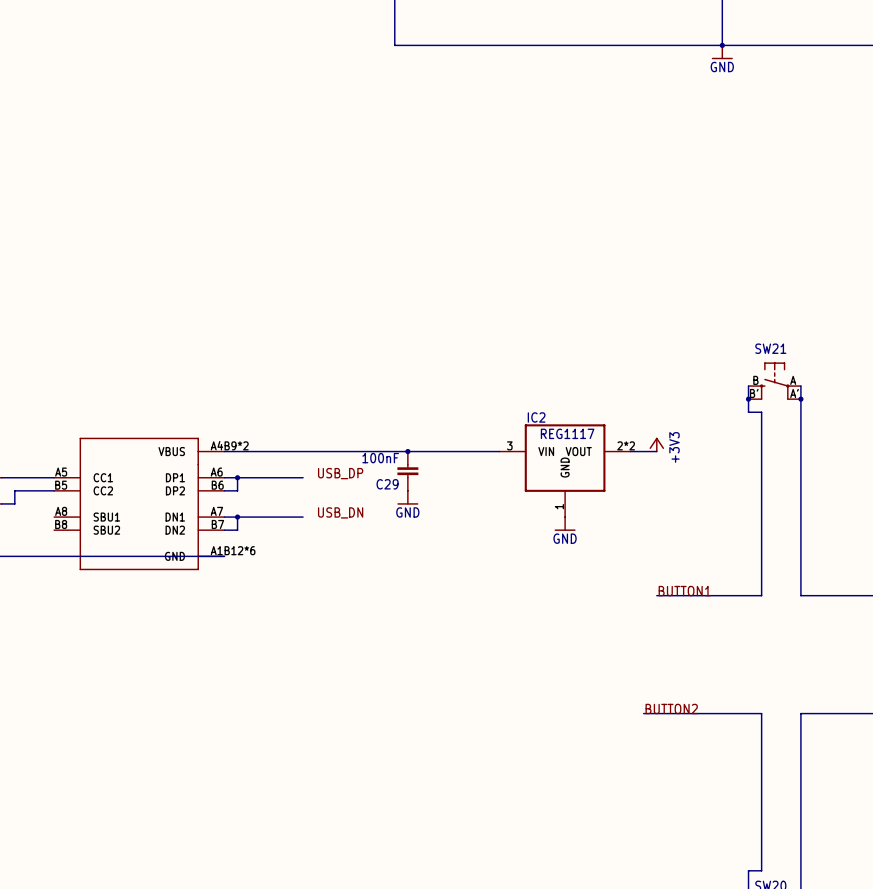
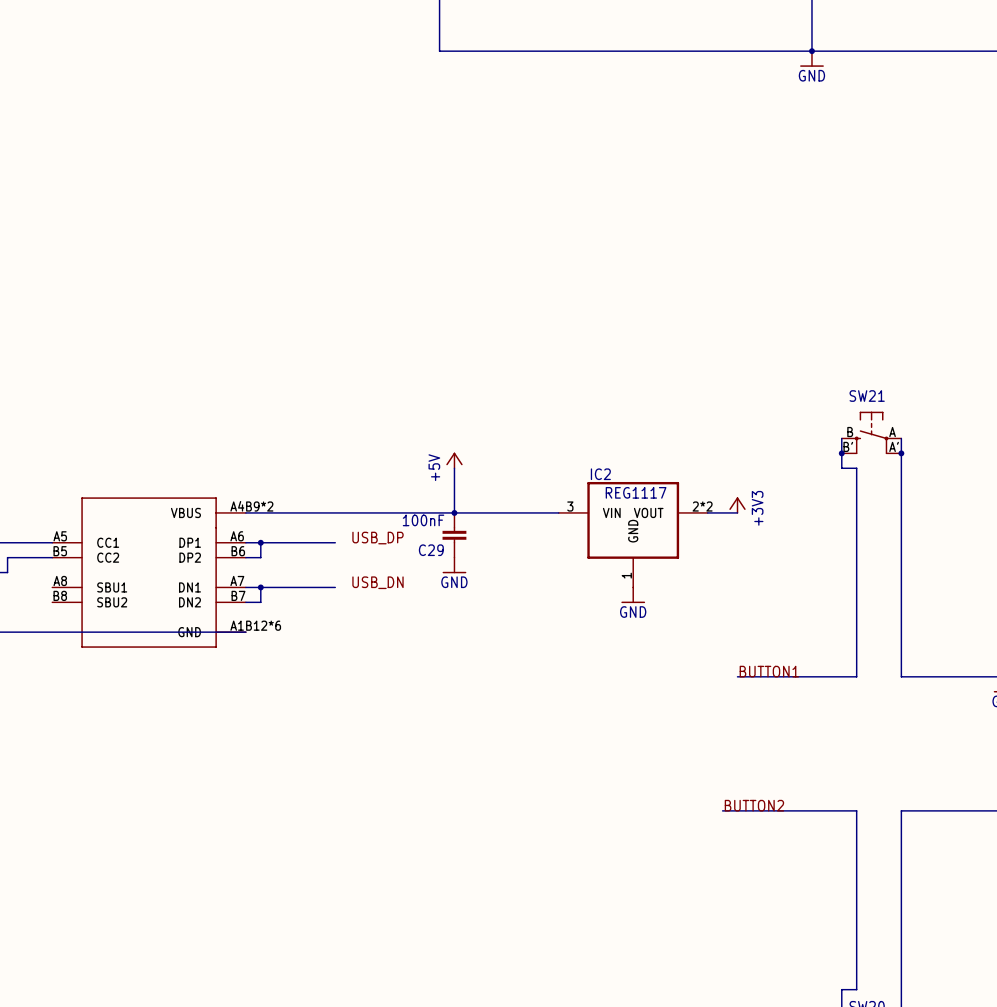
power symbol: none -> +5V (454, 460)
wire: none -> (454, 468) (454, 512)

